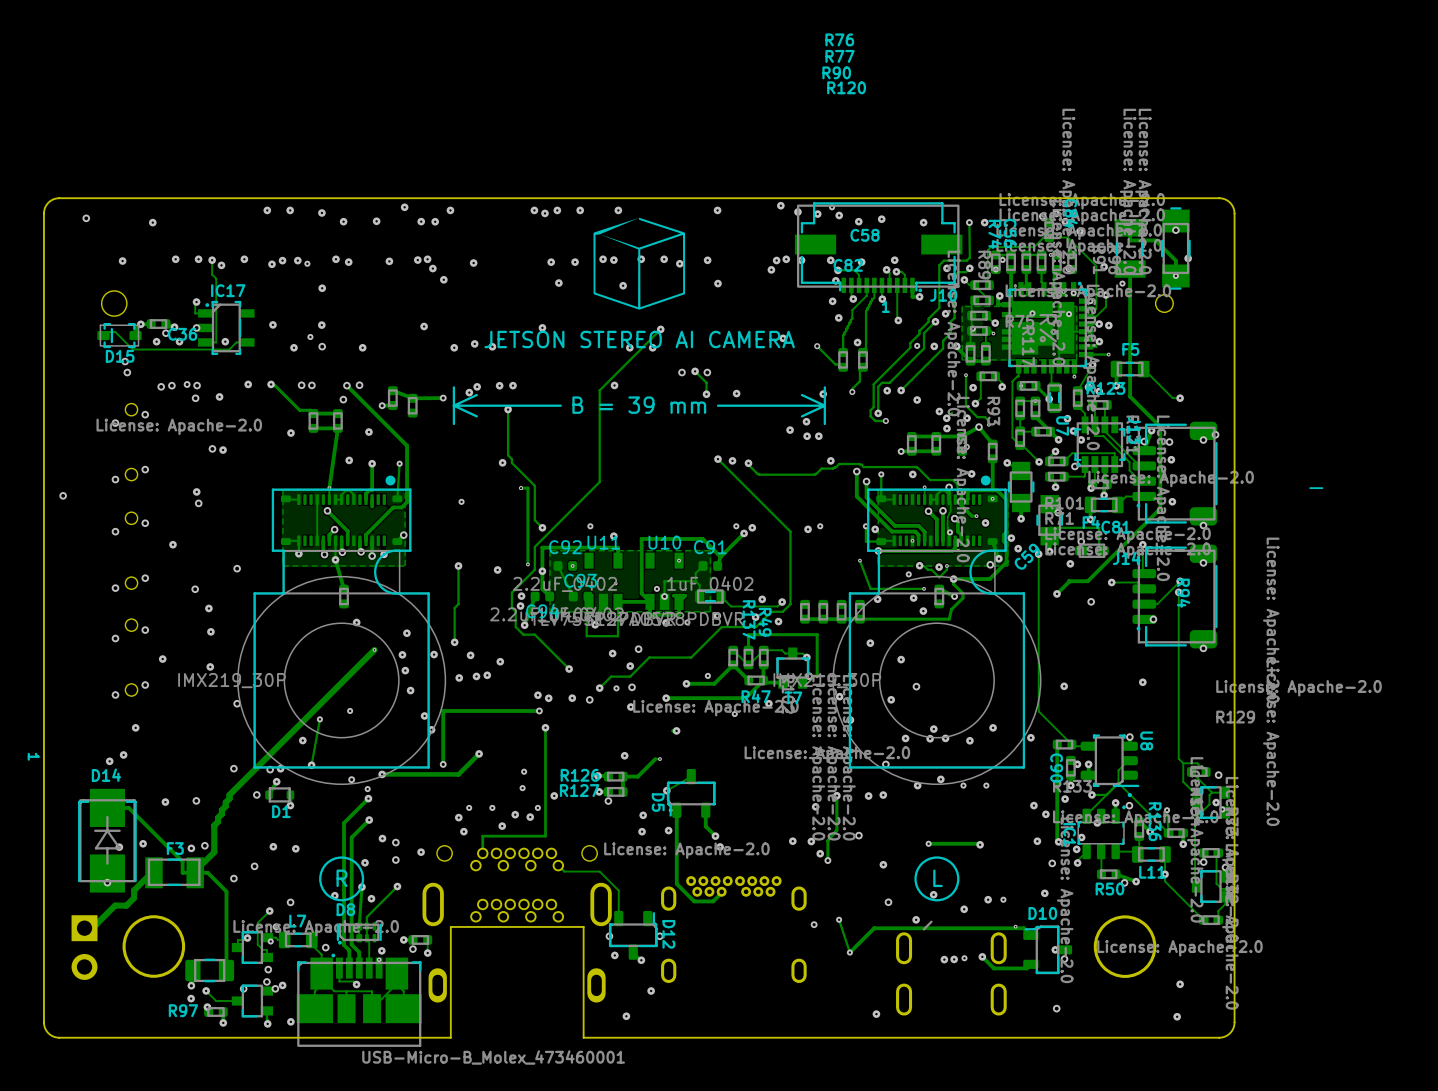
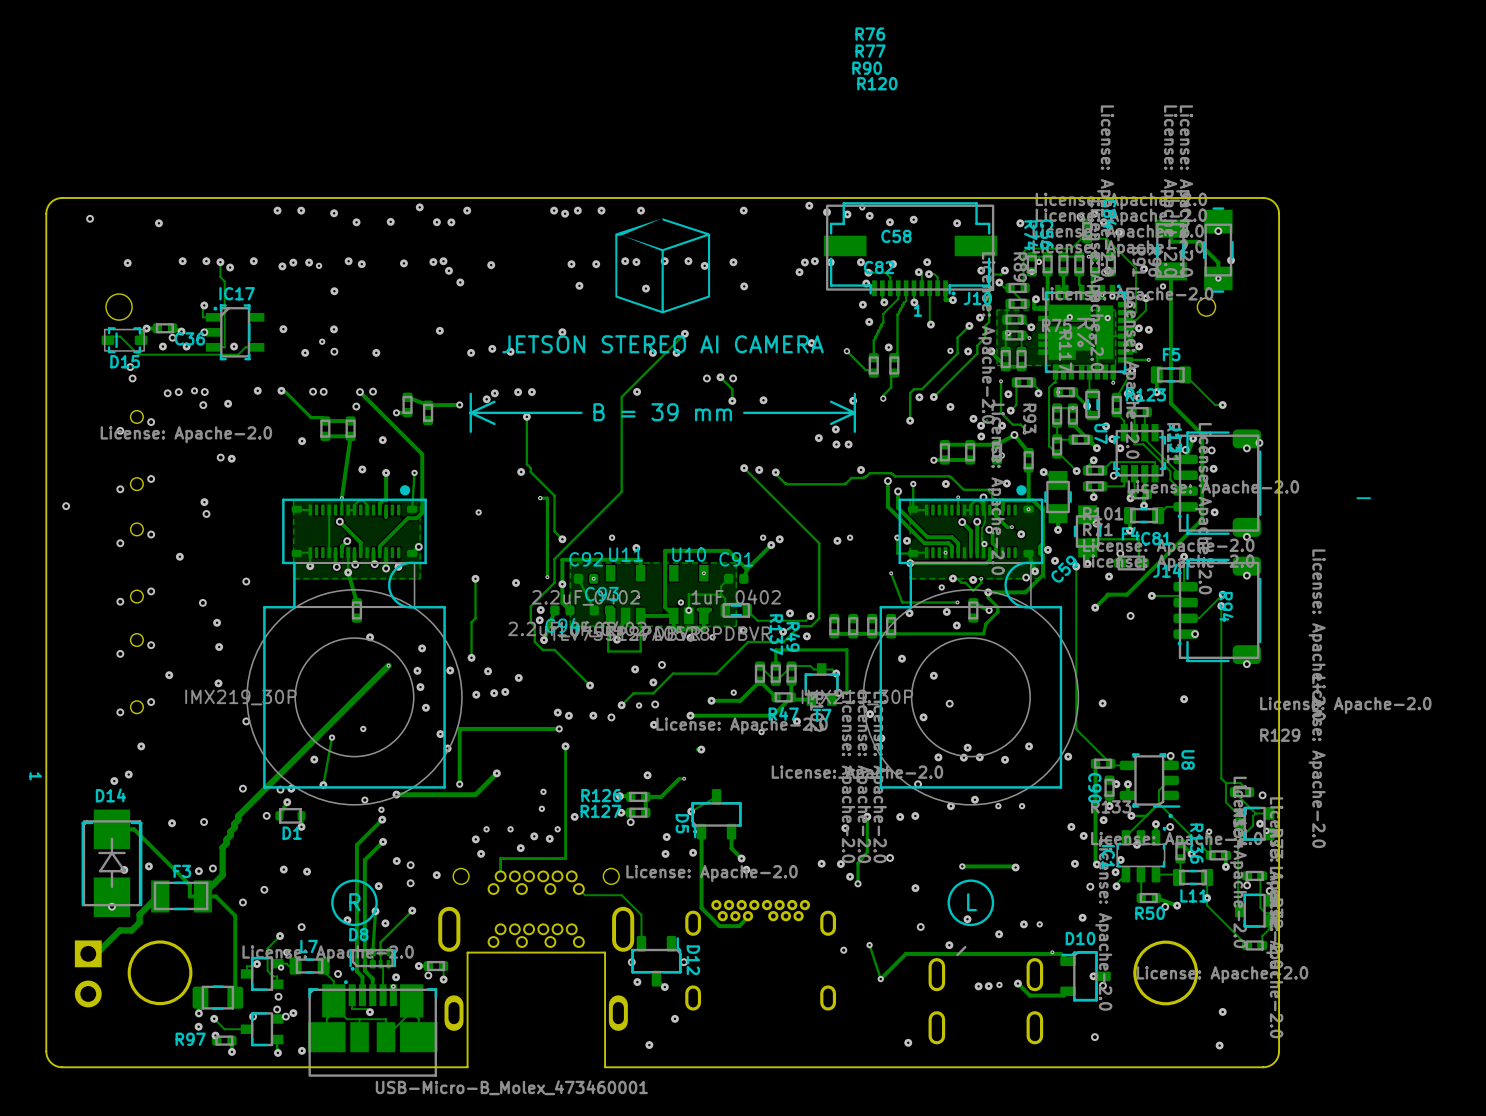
track: (969, 222) (969, 257) (966, 260) (943, 260) (939, 265) (939, 308) (910, 343) (910, 347) (873, 384) (873, 407) (870, 410) (870, 416) (875, 420) (885, 420) -> none
via: (969, 222) -> none
via: (885, 420) -> none

